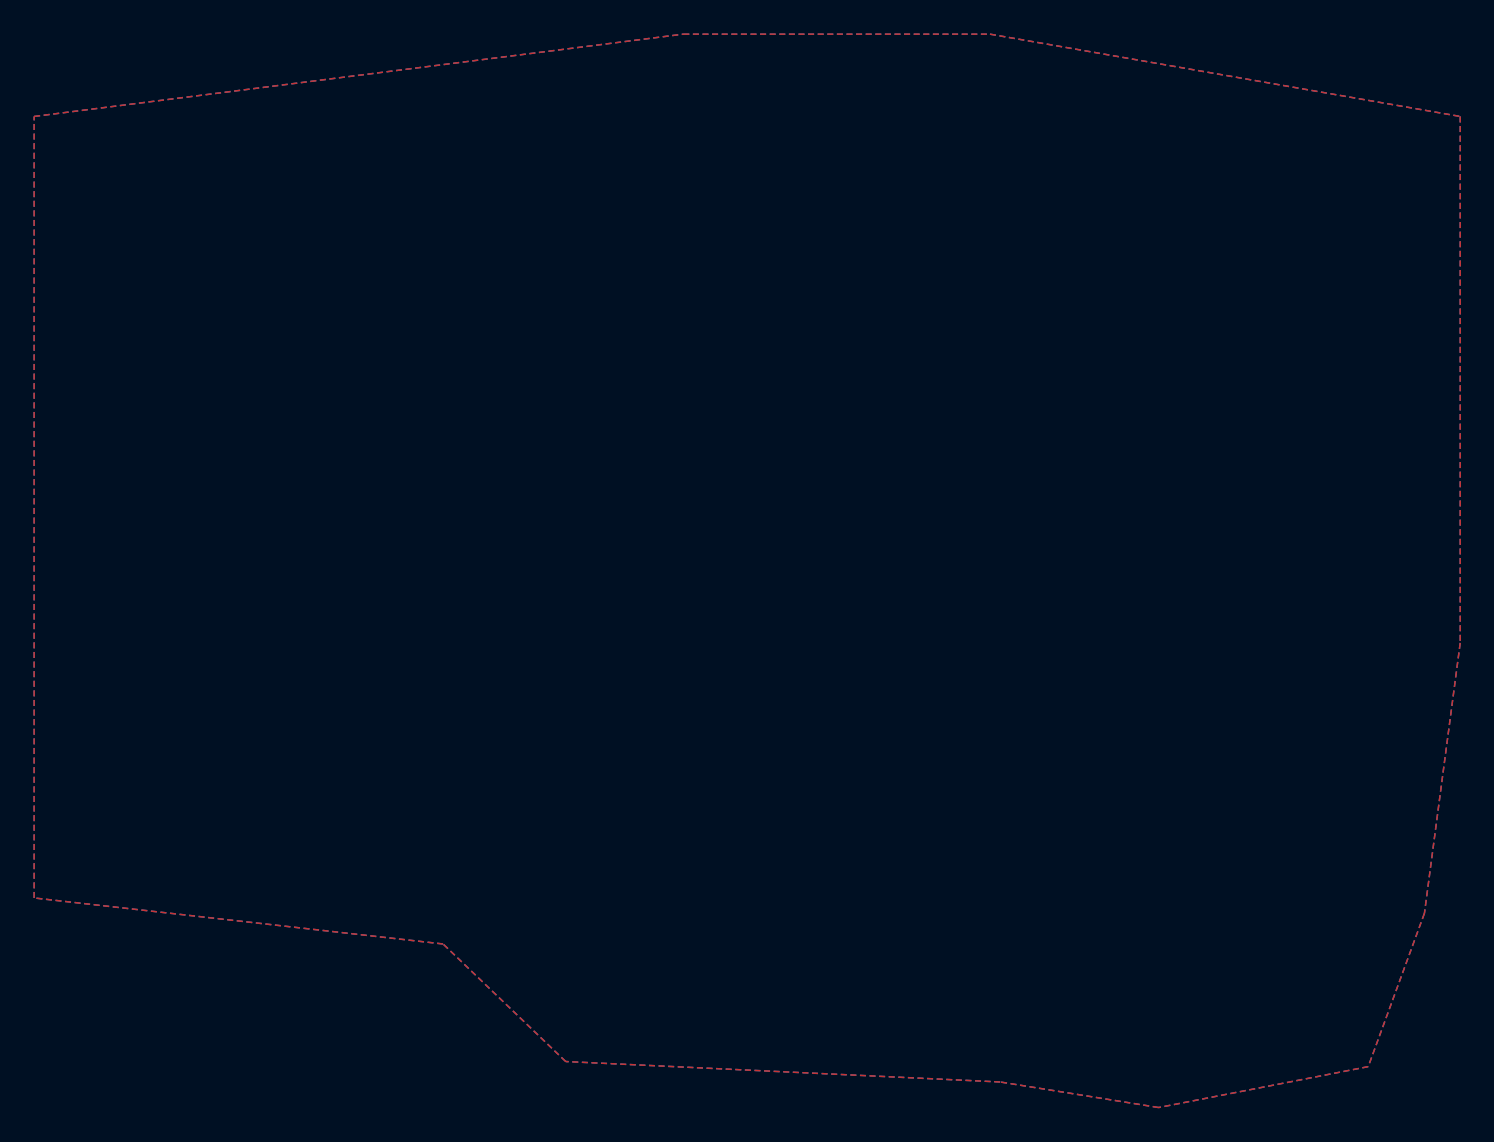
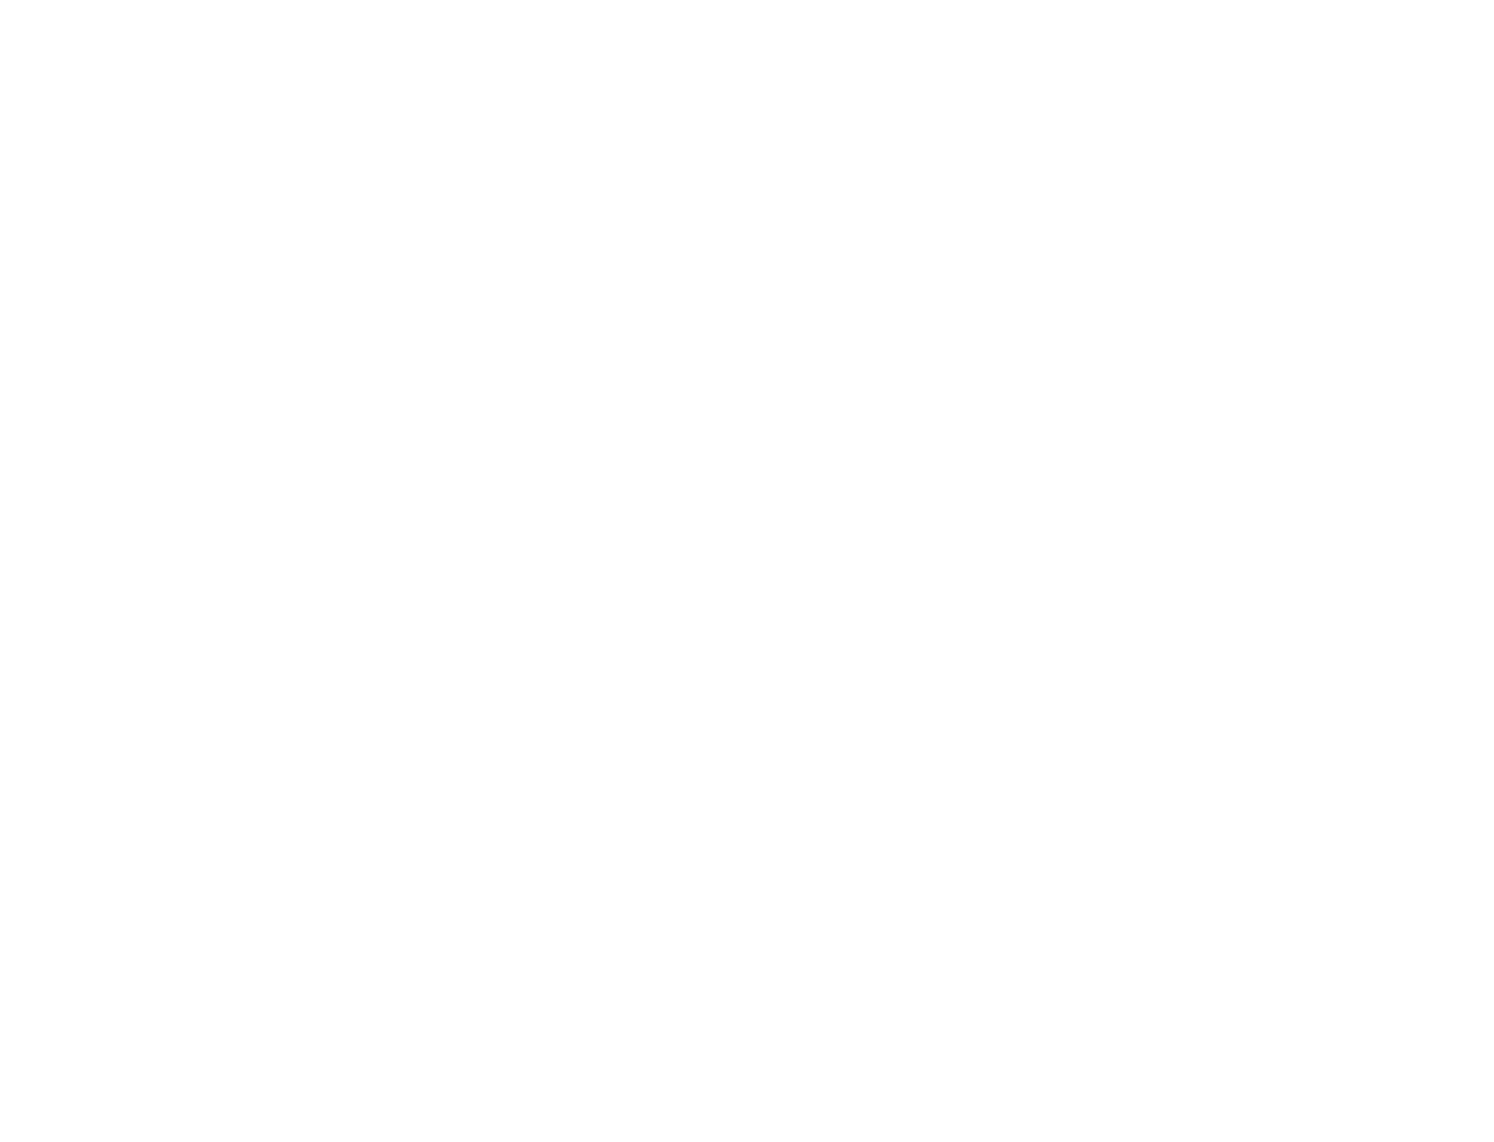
top zone outline: (683, 34) (34, 116) (34, 897) (443, 943) (565, 1061) (1000, 1081) (1158, 1107) (1368, 1066) (1424, 913) (1460, 642) (1460, 116) (989, 34) (683, 34) -> none

